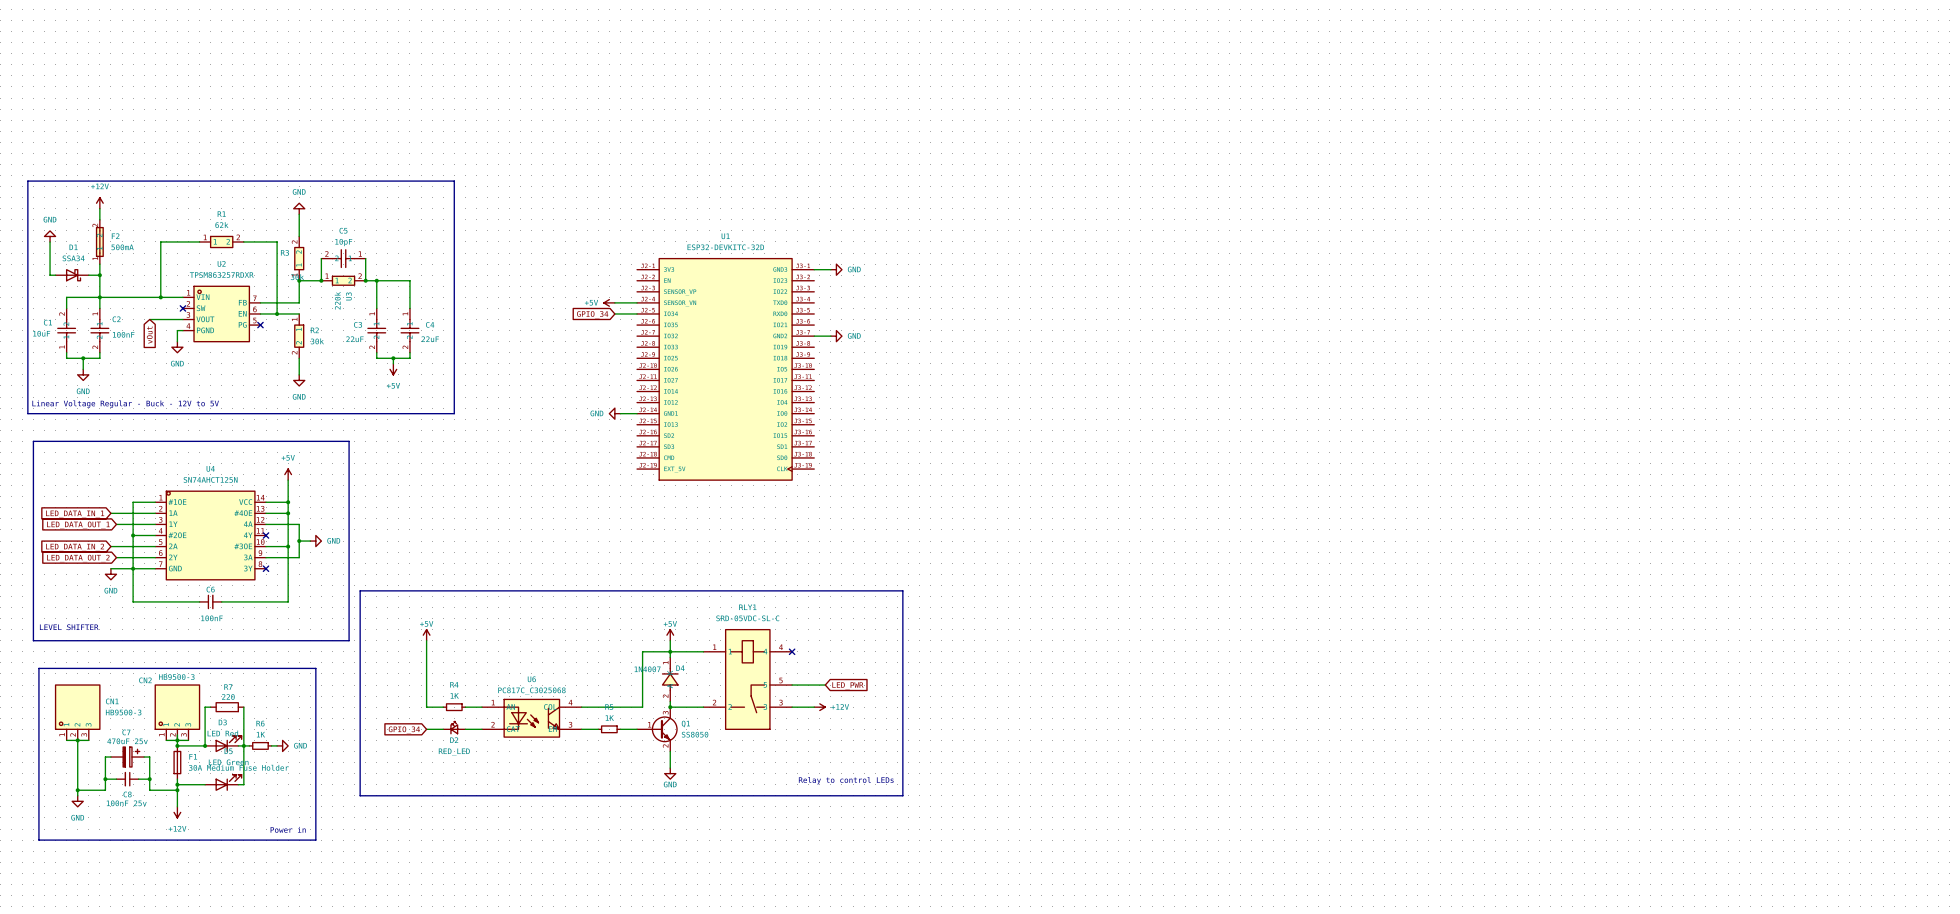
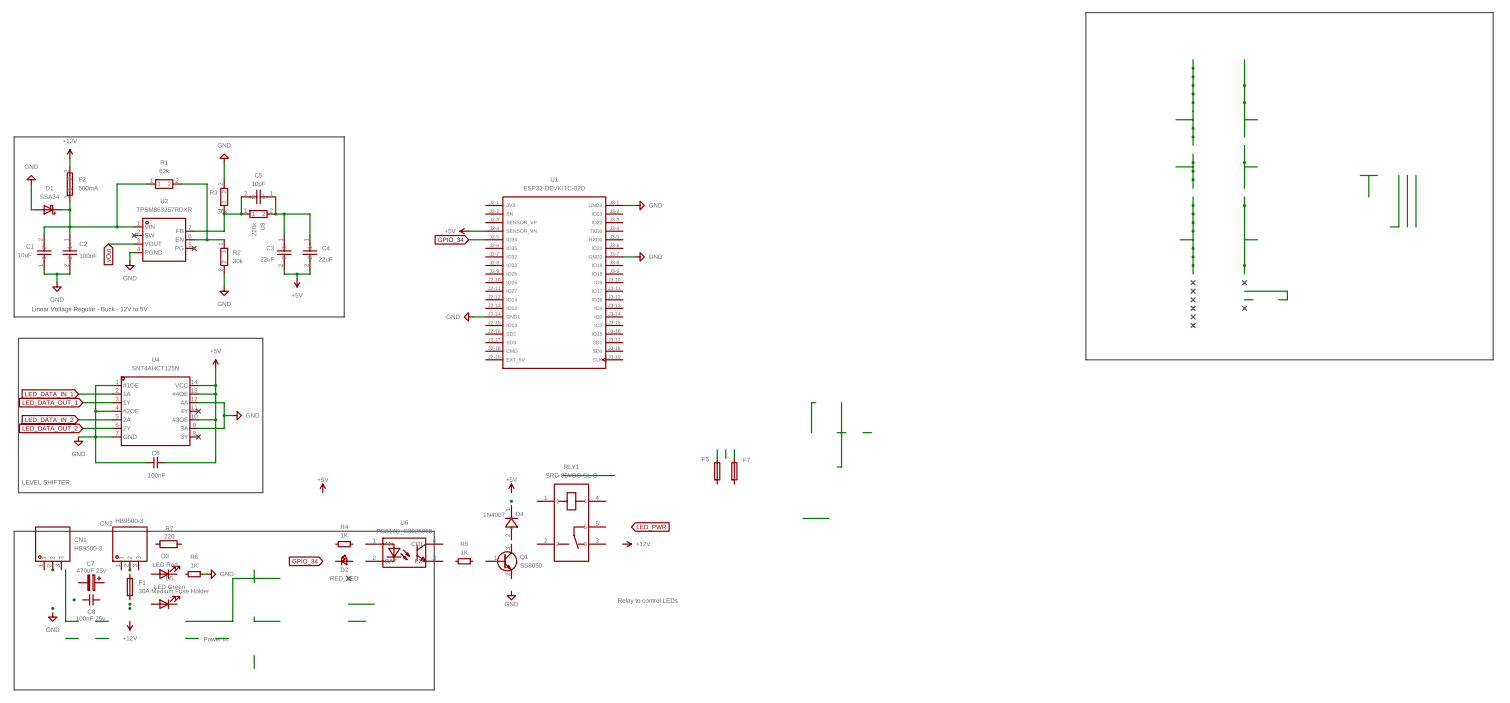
line: none -> (1085, 12) (1493, 12) (1493, 359) (1085, 359) (1085, 12)
wire: none -> (1193, 59) (1193, 145)
wire: none -> (1244, 59) (1244, 136)
junction: none -> (1193, 68)
junction: none -> (1193, 76)
junction: none -> (1193, 85)
junction: none -> (1244, 85)
junction: none -> (1193, 94)
junction: none -> (1193, 102)
junction: none -> (1244, 102)
wire: none -> (1175, 119) (1193, 119)
wire: none -> (1244, 119) (1257, 119)
junction: none -> (1193, 128)
junction: none -> (1193, 136)
wire: none -> (1244, 145) (1244, 188)
wire: none -> (1193, 154) (1193, 188)
junction: none -> (1193, 162)
junction: none -> (1244, 162)
wire: none -> (1175, 166) (1193, 166)
wire: none -> (1244, 166) (1257, 166)
junction: none -> (1193, 171)
wire: none -> (1360, 175) (1377, 175)
wire: none -> (1368, 175) (1368, 196)
wire: none -> (1398, 175) (1398, 226) (1390, 226)
wire: none -> (1407, 175) (1407, 226)
wire: none -> (1415, 175) (1415, 226)
junction: none -> (1193, 179)
wire: none -> (1193, 196) (1193, 274)
wire: none -> (1244, 196) (1244, 274)
junction: none -> (1193, 205)
junction: none -> (1244, 205)
junction: none -> (1193, 214)
junction: none -> (1193, 222)
junction: none -> (1193, 231)
wire: none -> (1180, 239) (1193, 239)
wire: none -> (1244, 239) (1257, 239)
junction: none -> (1193, 248)
junction: none -> (1193, 256)
junction: none -> (1193, 265)
junction: none -> (1244, 265)
no-connect mark: none -> (1193, 282)
no-connect mark: none -> (1244, 282)
no-connect mark: none -> (1193, 291)
wire: none -> (1244, 291) (1287, 291) (1287, 299) (1278, 299)
no-connect mark: none -> (1193, 299)
wire: none -> (1244, 299) (1253, 299)
no-connect mark: none -> (1193, 308)
no-connect mark: none -> (1244, 308)
no-connect mark: none -> (1193, 316)
no-connect mark: none -> (1193, 325)
wire: none -> (815, 402) (811, 402) (811, 432)
wire: none -> (841, 402) (841, 466) (837, 466)
wire: none -> (837, 432) (845, 432)
wire: none -> (862, 432) (871, 432)
wire: none -> (717, 449) (717, 458)
wire: none -> (725, 449) (725, 458)
wire: none -> (734, 449) (734, 458)
line: (360, 590) (902, 590) (902, 795) (360, 795) (360, 590) -> none
part: none -> (717, 471)
part: none -> (734, 471)
wire: none -> (562, 475) (614, 475)
wire: (426, 640) (426, 707) (443, 707) -> none
wire: (670, 640) (670, 657) -> none
wire: (703, 651) (642, 651) (642, 707) (581, 707) -> none
no-connect mark: (792, 651) -> none
line: (38, 668) (315, 668) (315, 840) (38, 840) (38, 668) -> none
wire: none -> (802, 518) (828, 518)
wire: (792, 685) (825, 685) -> none
line: none -> (14, 531) (14, 689) (434, 689) (434, 531) (14, 531)
wire: (670, 701) (670, 707) (703, 707) -> none
wire: (210, 707) (205, 707) (205, 745) (177, 745) (177, 734) -> none
wire: (243, 707) (243, 784) (238, 784) -> none
wire: (465, 707) (481, 707) -> none
junction: (670, 707) -> none
wire: (792, 707) (814, 707) -> none
wire: (426, 729) (443, 729) -> none
wire: (465, 729) (481, 729) -> none
wire: (581, 729) (598, 729) -> none
wire: (620, 729) (637, 729) -> none
wire: (66, 740) (88, 740) -> none
wire: (77, 740) (77, 795) -> none
wire: none -> (65, 569) (65, 621) (78, 621)
wire: (166, 740) (188, 740) -> none
wire: none -> (254, 569) (254, 582)
junction: (177, 745) -> none
junction: (205, 745) -> none
wire: (238, 745) (249, 745) -> none
junction: (243, 745) -> none
wire: none -> (279, 578) (232, 578) (232, 621) (185, 621)
no-connect mark: none -> (348, 578)
wire: (670, 751) (670, 768) -> none
wire: (110, 757) (105, 757) (105, 790) (77, 790) -> none
wire: (144, 757) (149, 757) (149, 790) (177, 790) -> none
wire: (105, 779) (116, 779) -> none
wire: (138, 779) (149, 779) -> none
junction: (149, 779) -> none
wire: (177, 779) (177, 806) -> none
wire: (177, 784) (205, 784) -> none
wire: none -> (348, 604) (374, 604)
wire: none -> (254, 617) (254, 621) (279, 621)
wire: none -> (95, 621) (108, 621)
wire: none -> (348, 621) (365, 621)
wire: none -> (65, 638) (78, 638)
wire: none -> (95, 638) (108, 638)
wire: none -> (185, 638) (198, 638)
wire: none -> (215, 638) (228, 638)
wire: none -> (254, 655) (254, 668)

